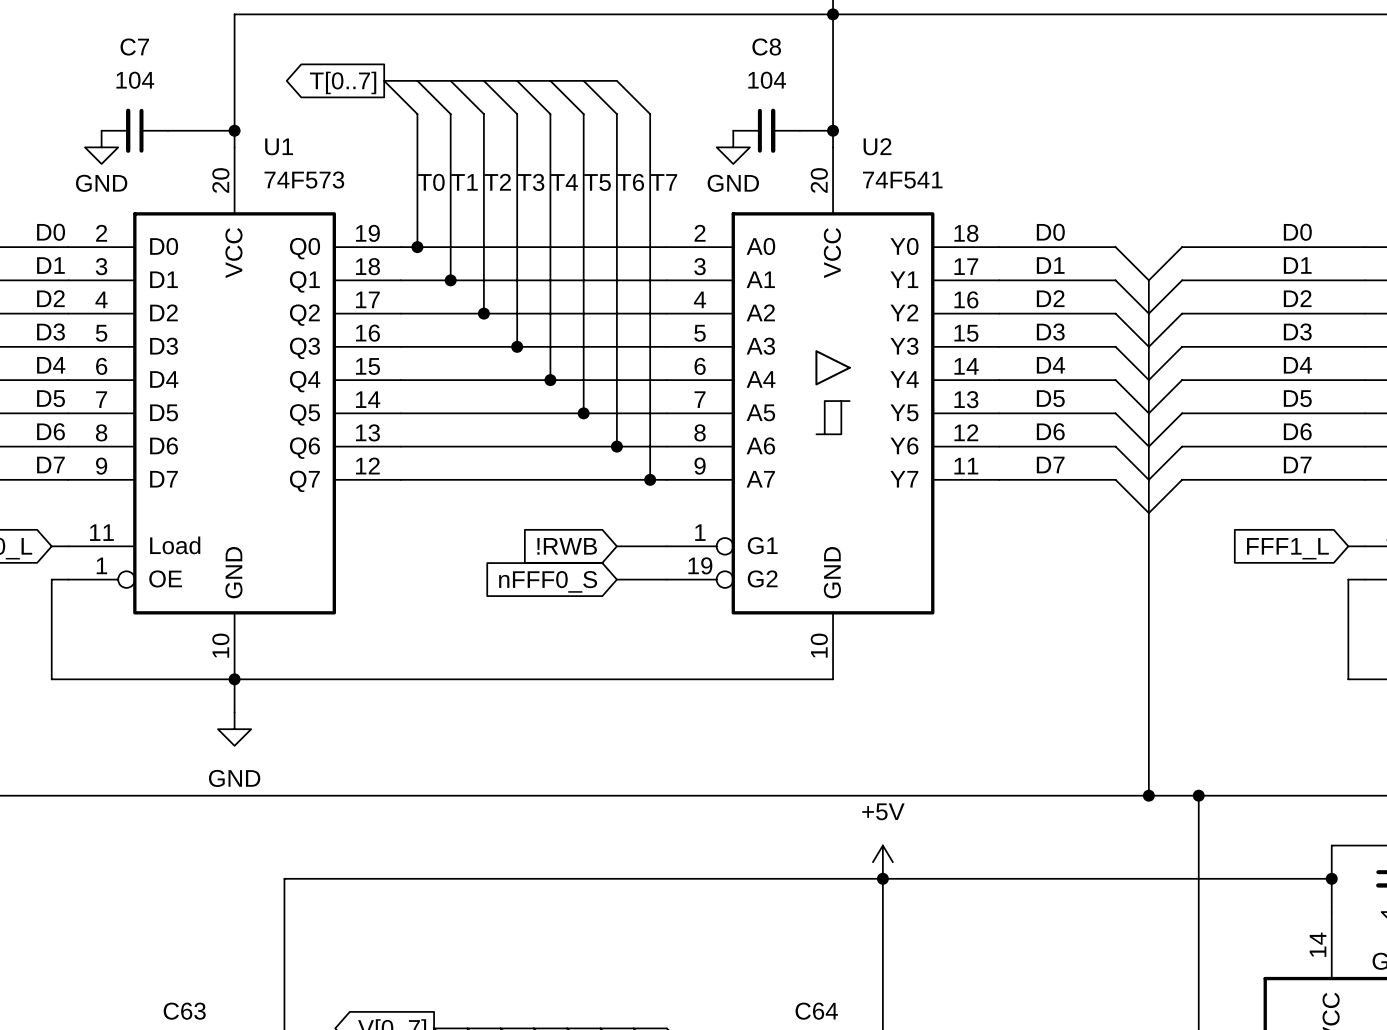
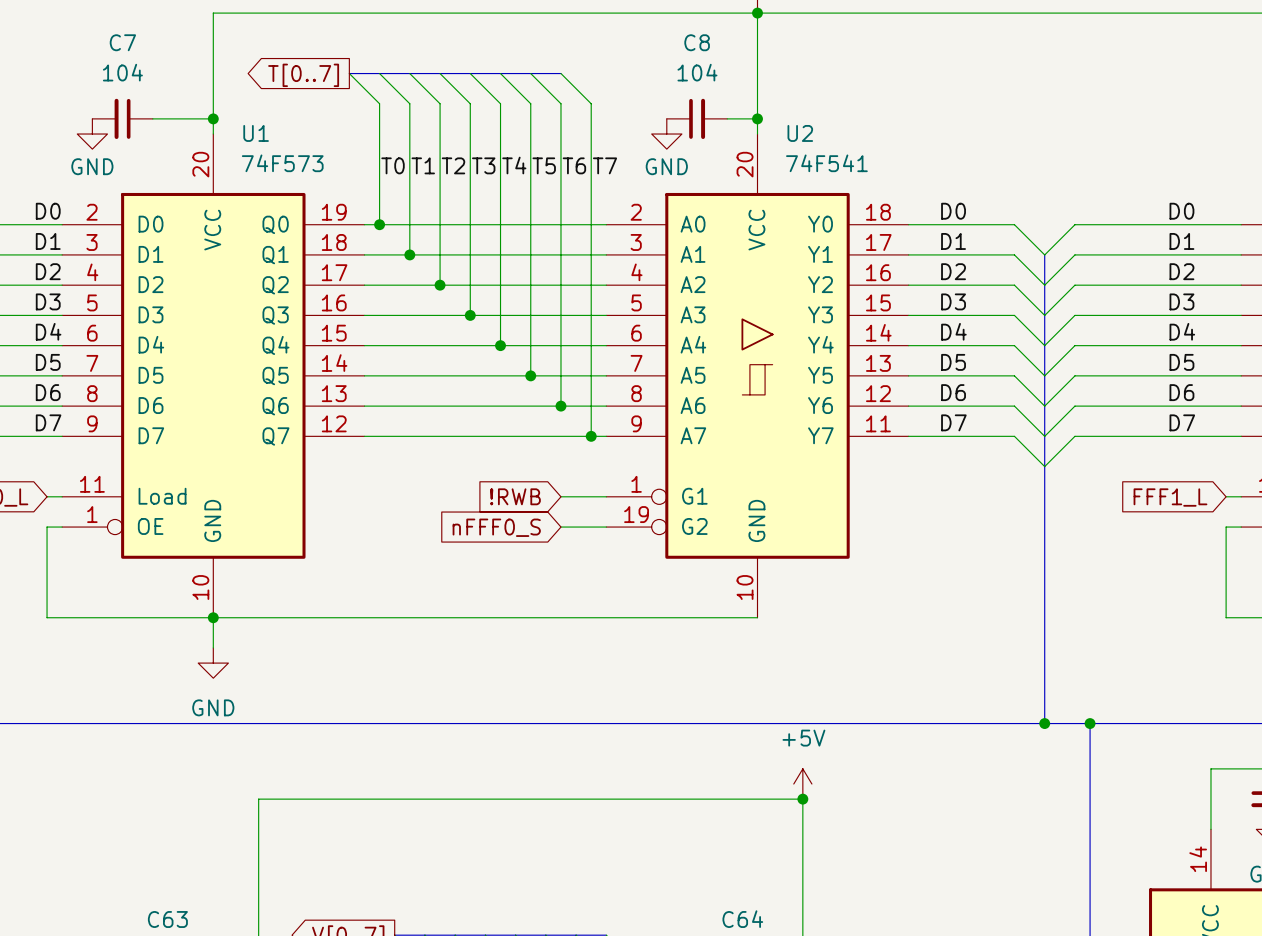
wire: (882, 878) (1331, 878) -> none
junction: (1331, 878) -> none

